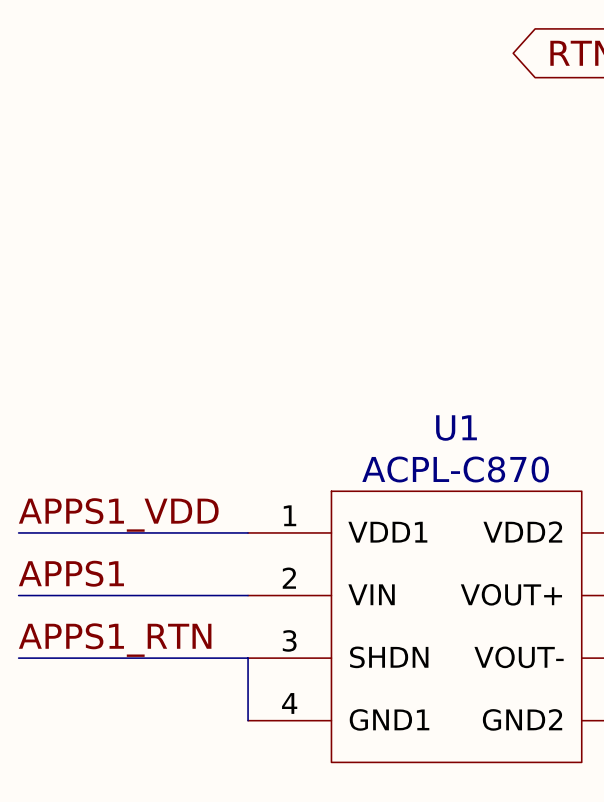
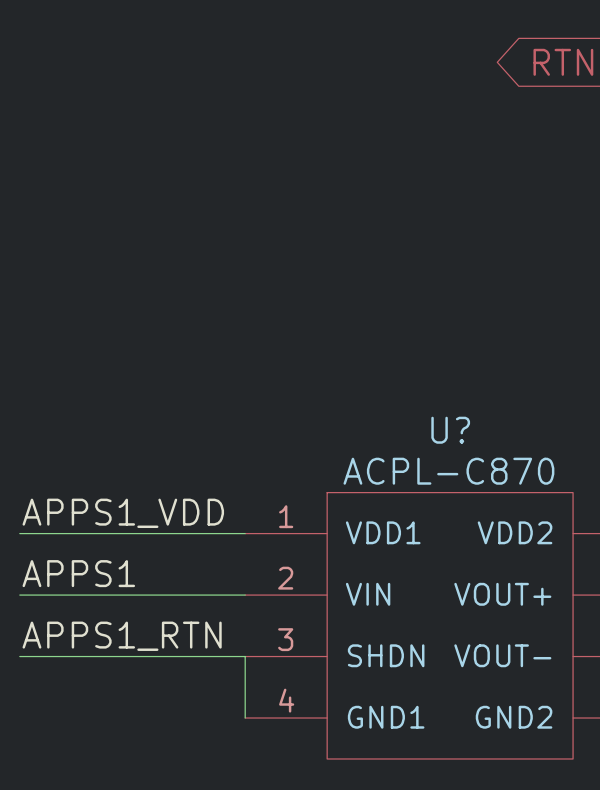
U1 name: U1 (456, 428) -> U? (450, 430)

